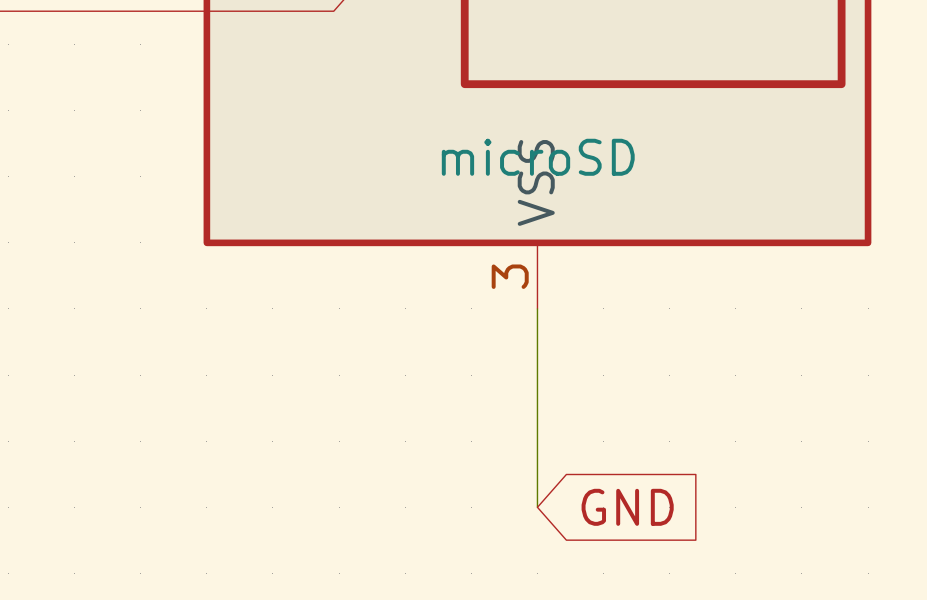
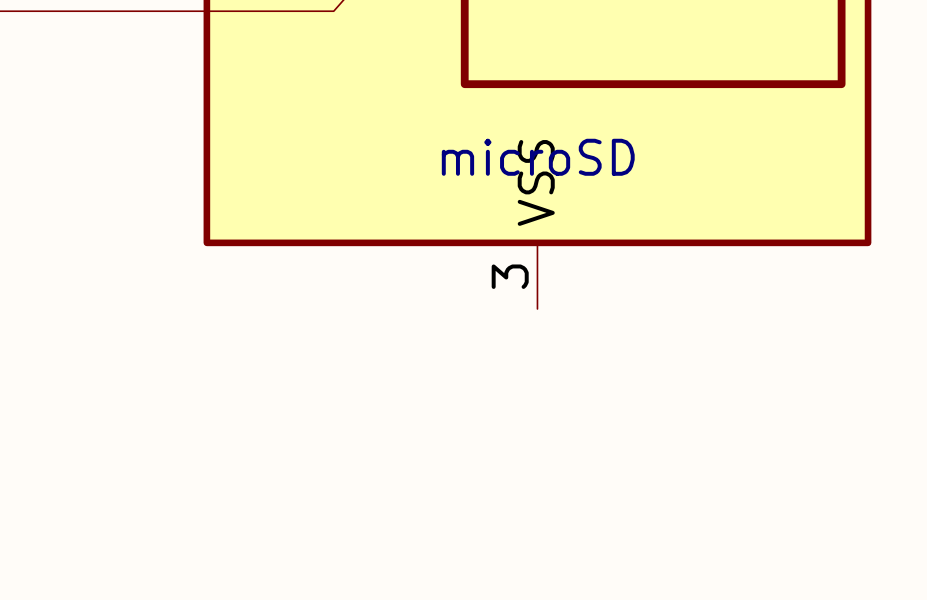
wire: (537, 308) (537, 507) -> none
global label: GND (627, 507) -> none

